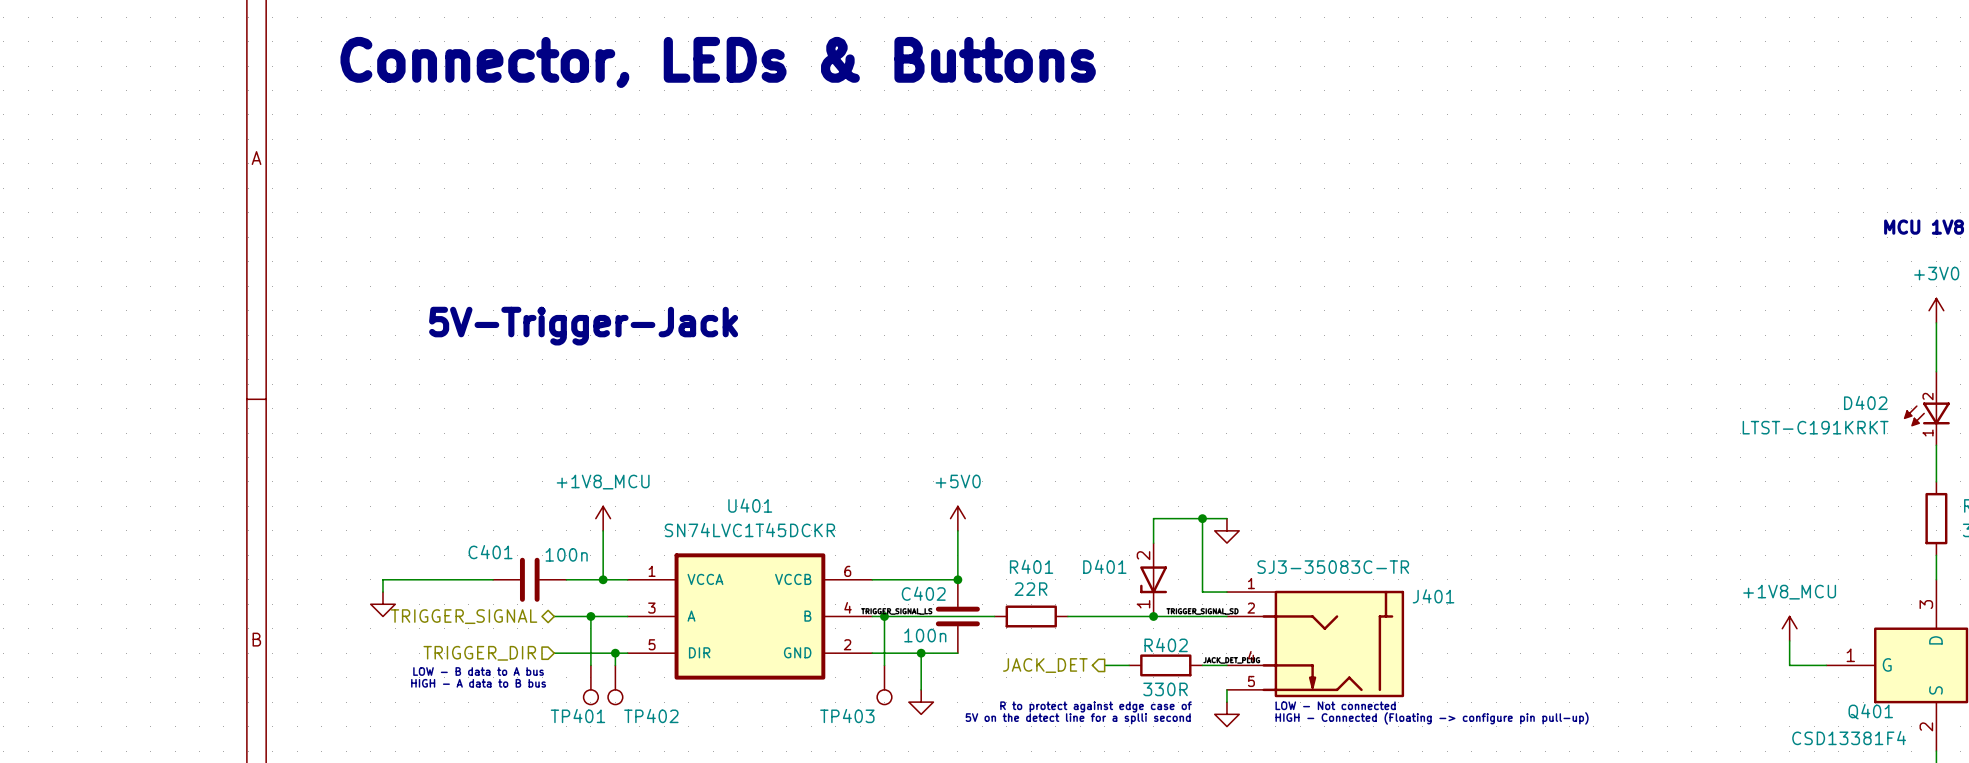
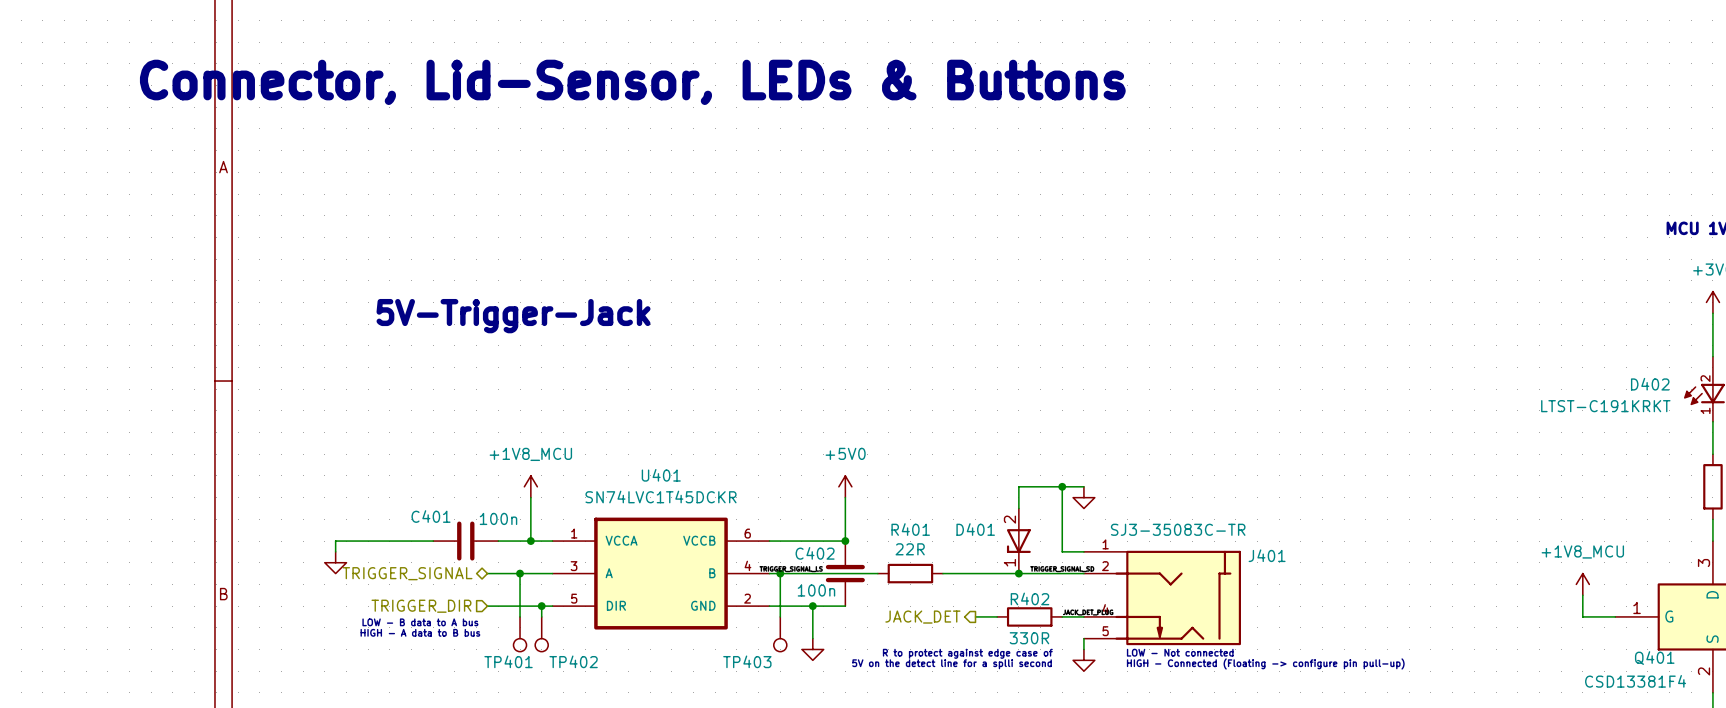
text: Connector, LEDs & Buttons (718, 62) -> Connector, Lid-Sensor, LEDs & Buttons (632, 82)

